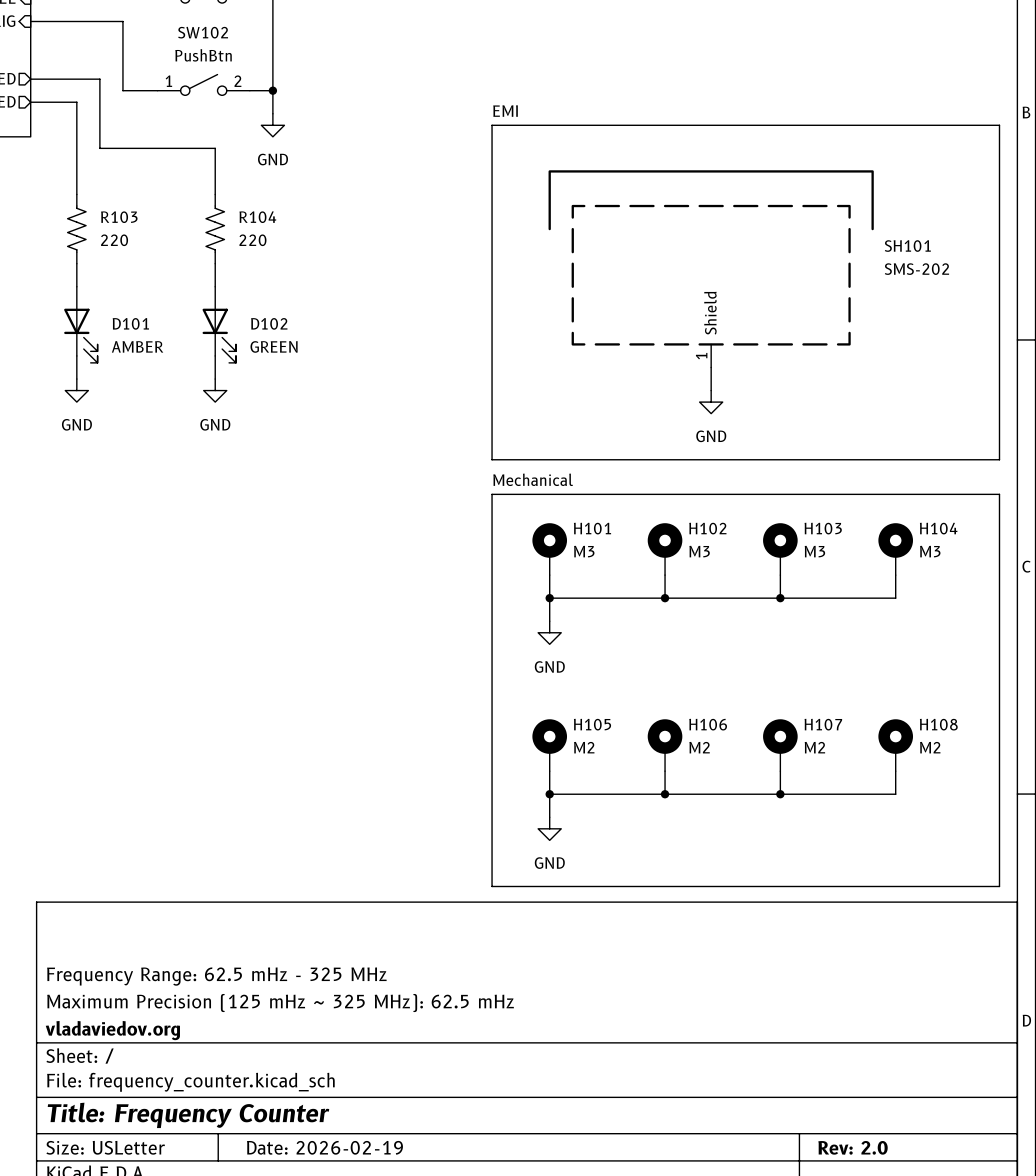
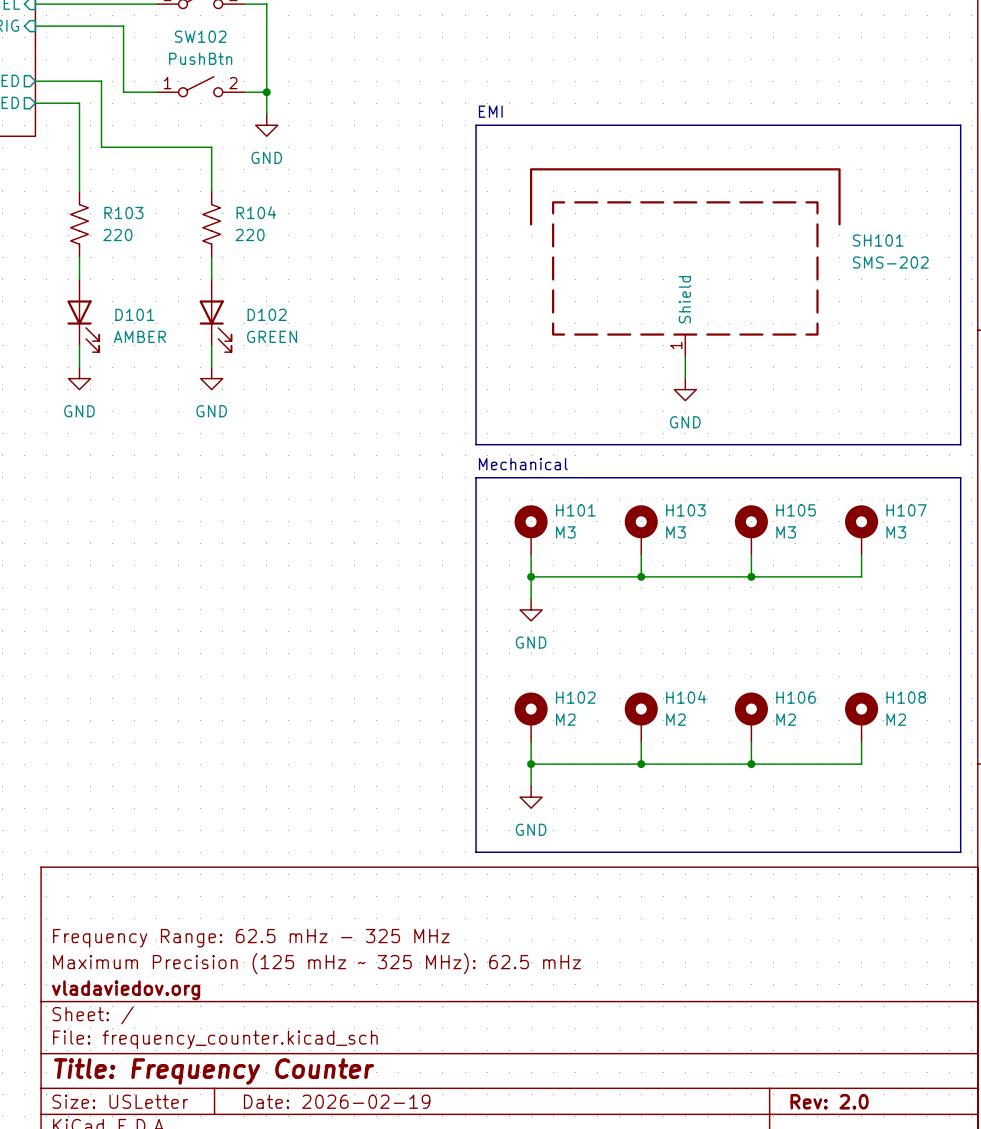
H102 name: H102 (707, 528) -> H103 (685, 510)
H103 name: H103 (823, 528) -> H105 (796, 510)
H104 name: H104 (938, 528) -> H107 (906, 510)
H105 name: H105 (592, 724) -> H102 (575, 697)
H106 name: H106 (708, 724) -> H104 (686, 697)
H107 name: H107 (823, 724) -> H106 (796, 697)

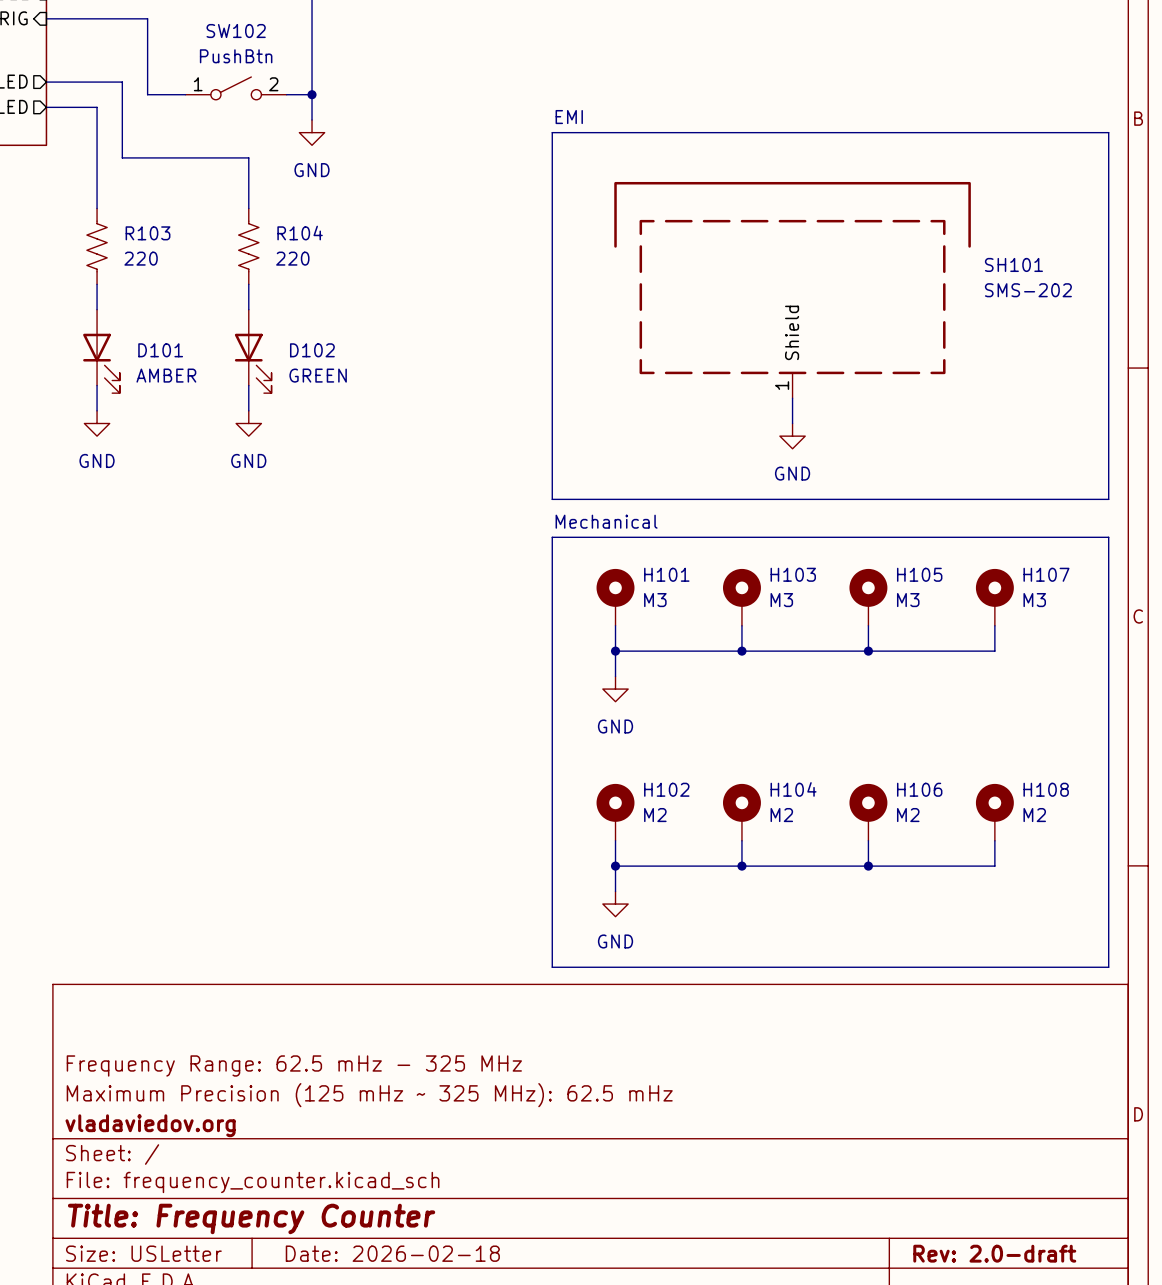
title block: Date: 2026-02-19 (337, 1101) -> Date: 2026-02-18 (392, 1253)
title block: Rev: 2.0 (829, 1101) -> Rev: 2.0-draft (994, 1253)

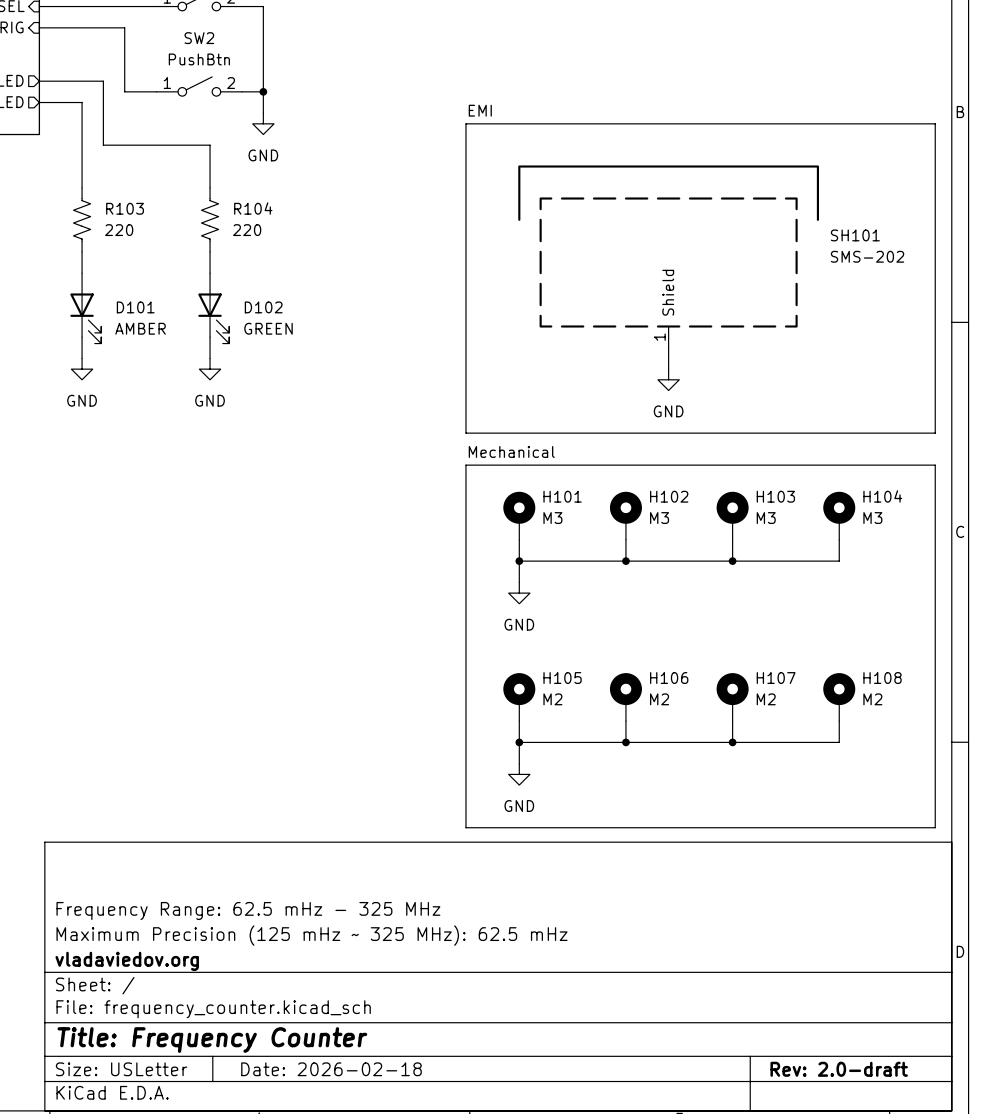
SW102 name: SW102 (236, 31) -> SW2 (199, 38)
H103 name: H103 (793, 574) -> H102 (669, 496)
H105 name: H105 (919, 574) -> H103 (775, 496)
H107 name: H107 (1046, 574) -> H104 (882, 496)
H102 name: H102 (666, 789) -> H105 (562, 678)
H104 name: H104 (793, 789) -> H106 (669, 678)
H106 name: H106 (919, 789) -> H107 (776, 678)

